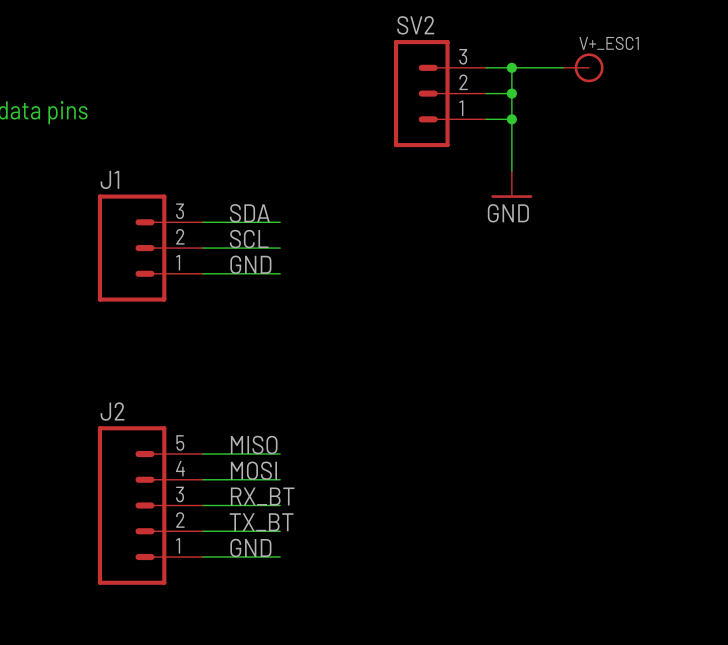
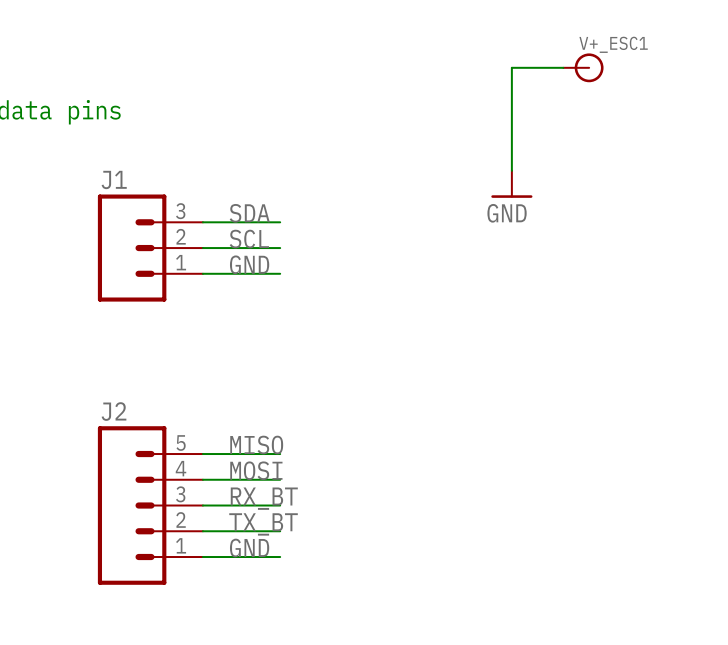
wire: (486, 67) (511, 67) -> none
junction: (511, 67) -> none
SV2: (440, 93) -> none
wire: (486, 93) (511, 93) -> none
junction: (511, 93) -> none
wire: (486, 119) (511, 119) -> none
junction: (511, 119) -> none

